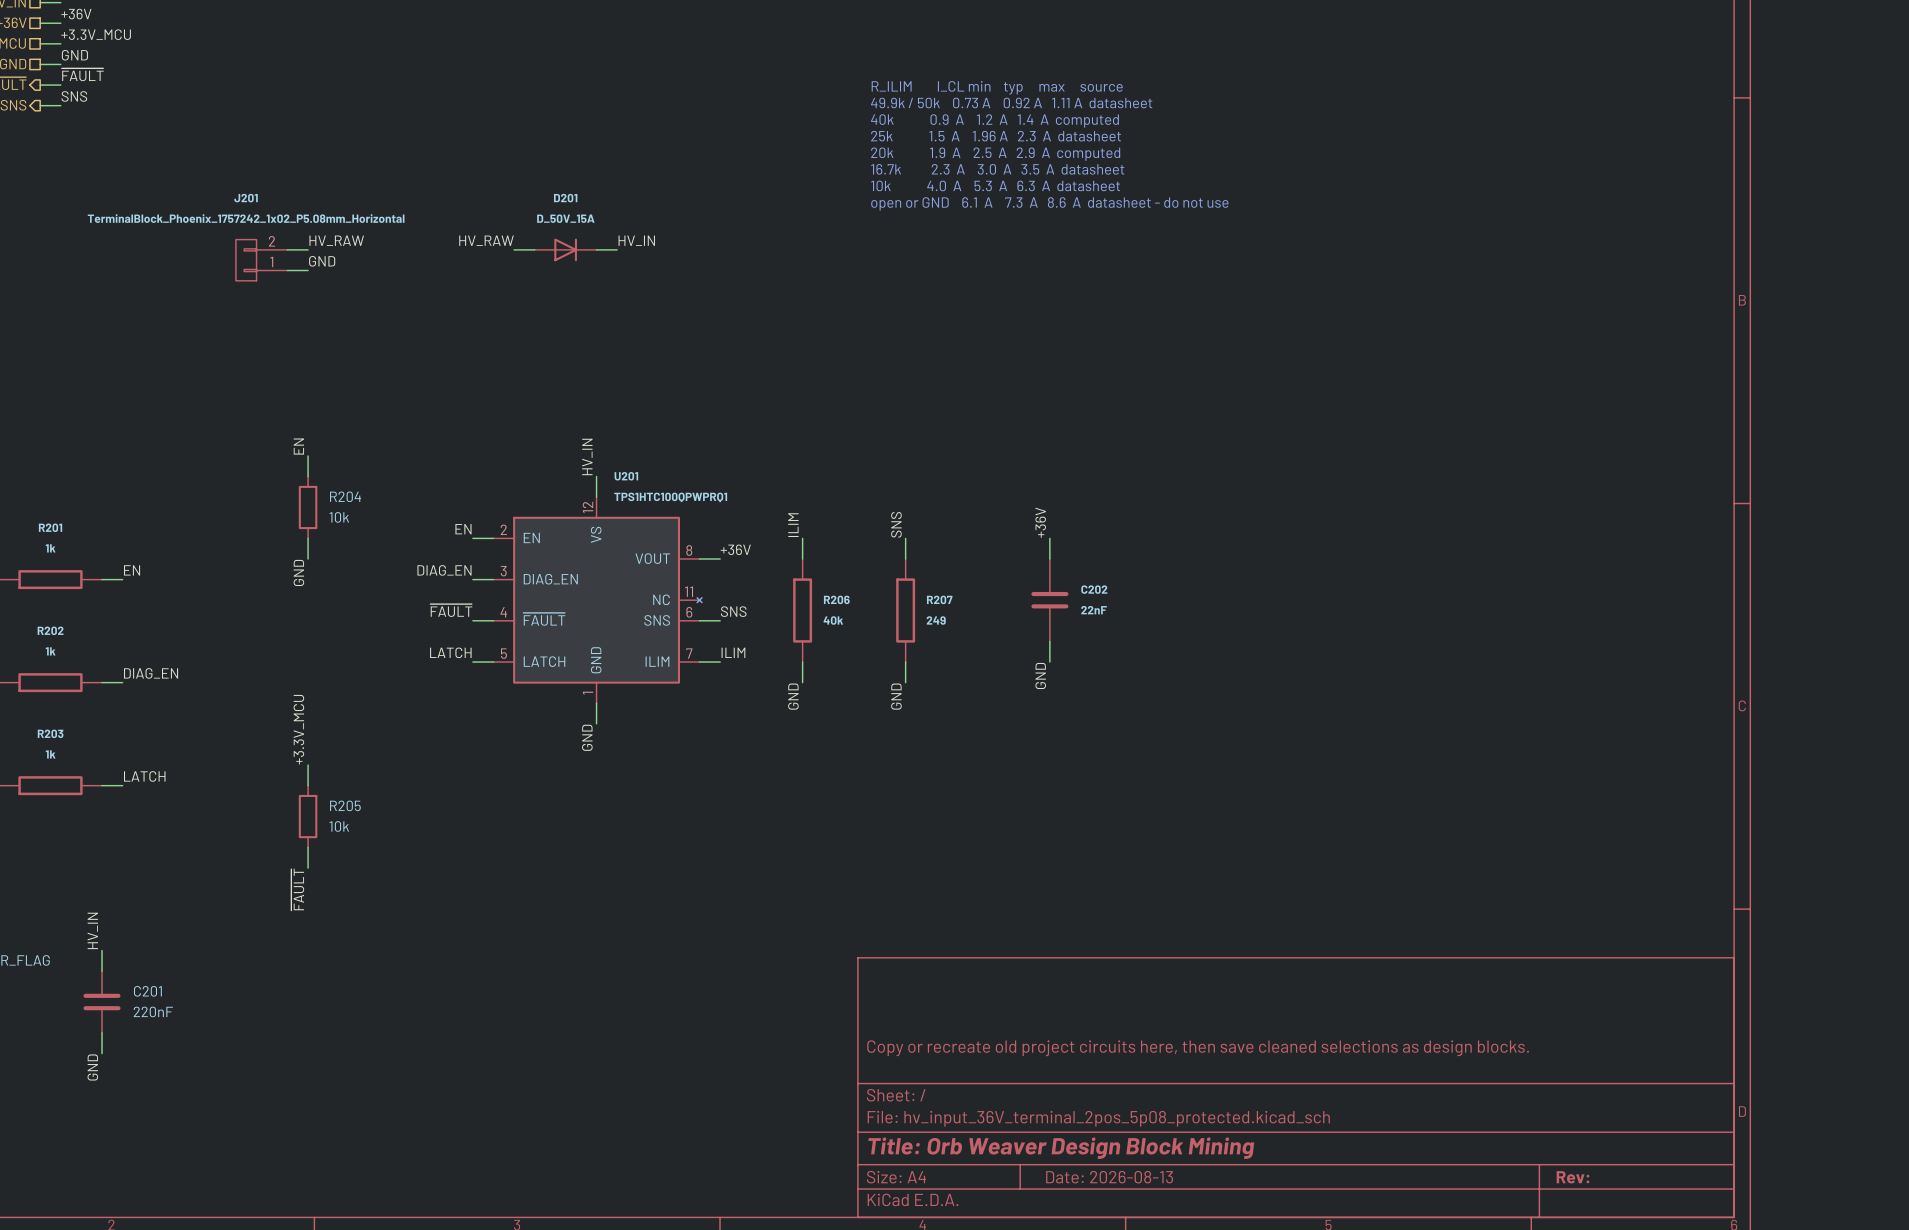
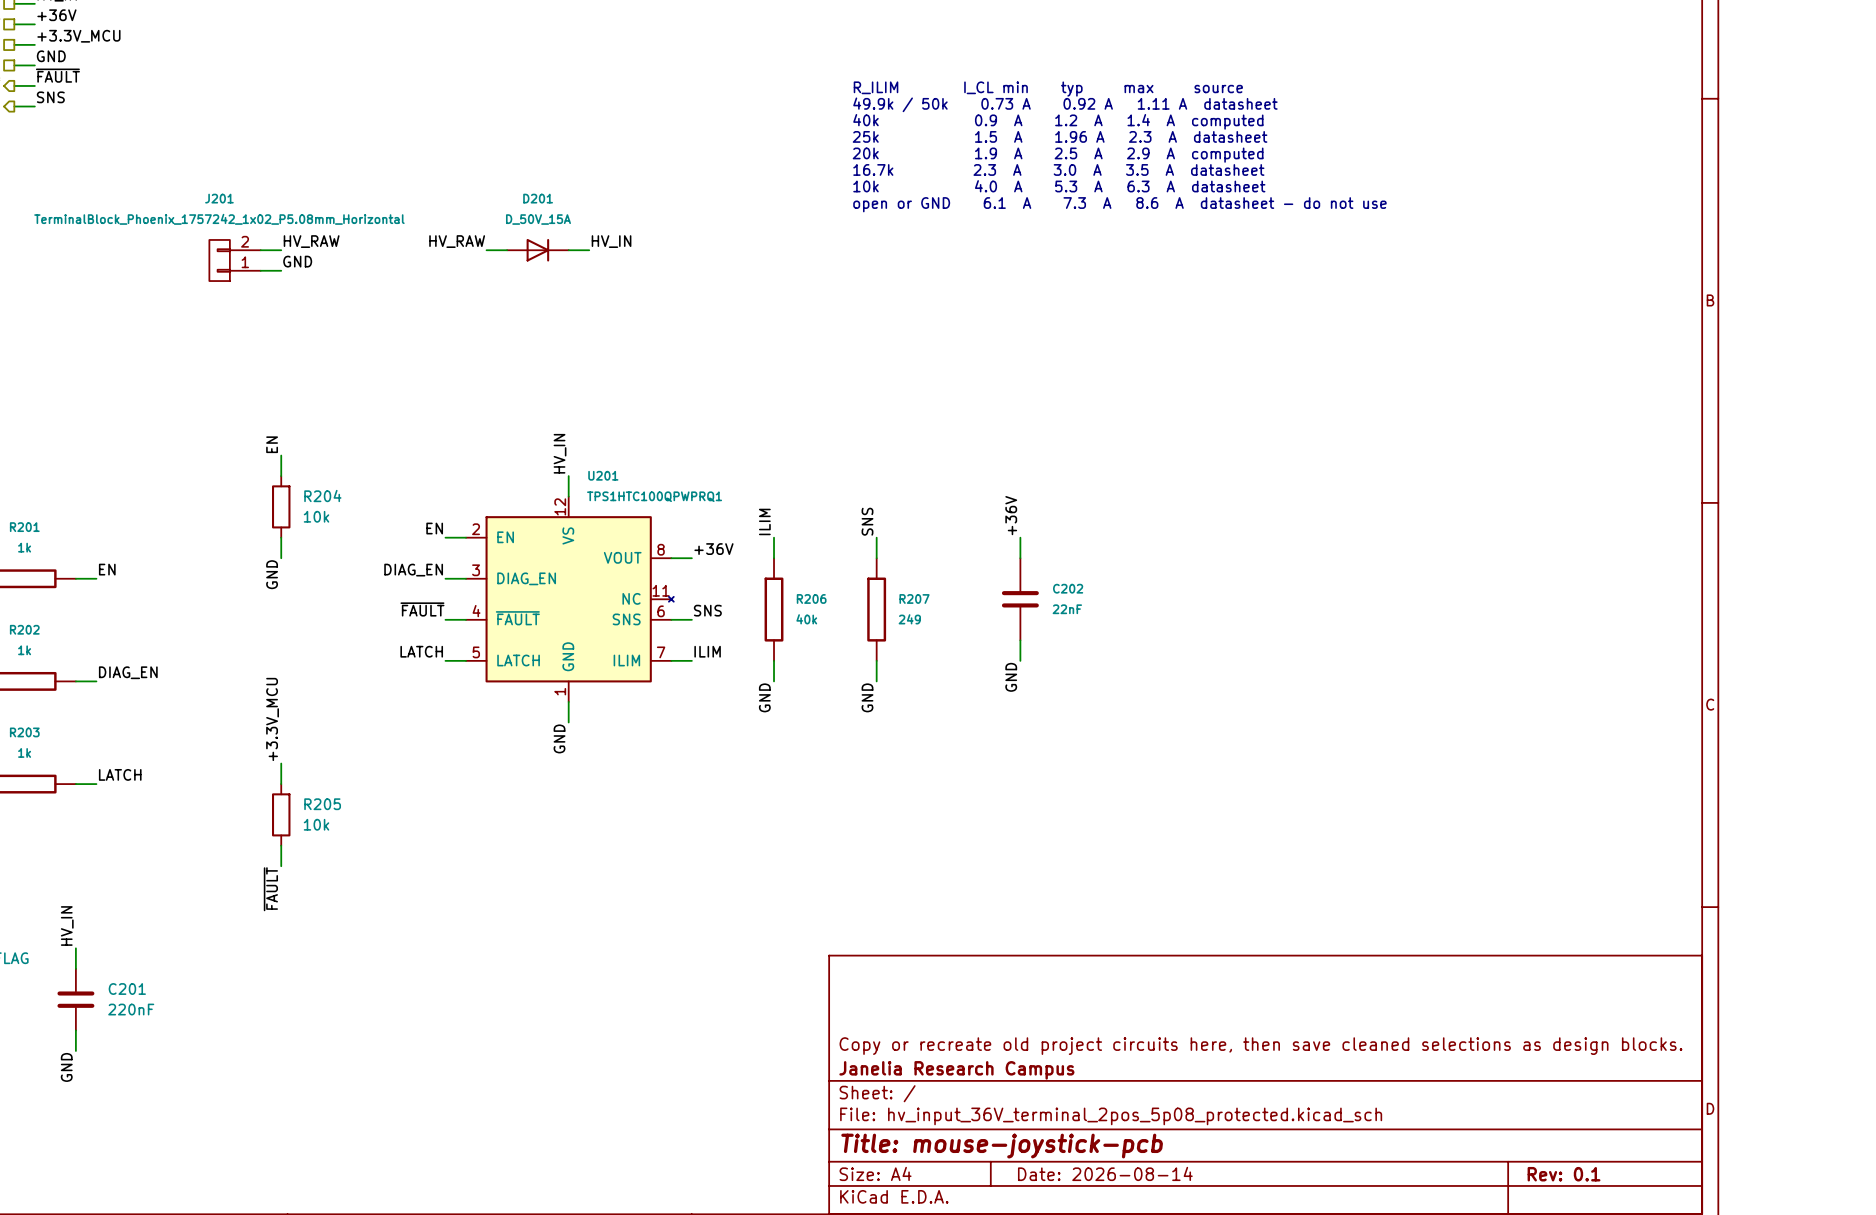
title block: none -> Janelia Research Campus (956, 1070)
title block: Title: Orb Weaver Design Block Mining (1061, 1148) -> Title: mouse-joystick-pcb (1002, 1146)
title block: Date: 2026-08-13 (1109, 1177) -> Date: 2026-08-14 (1105, 1173)
title block: Rev: (1572, 1177) -> Rev: 0.1 (1564, 1174)

